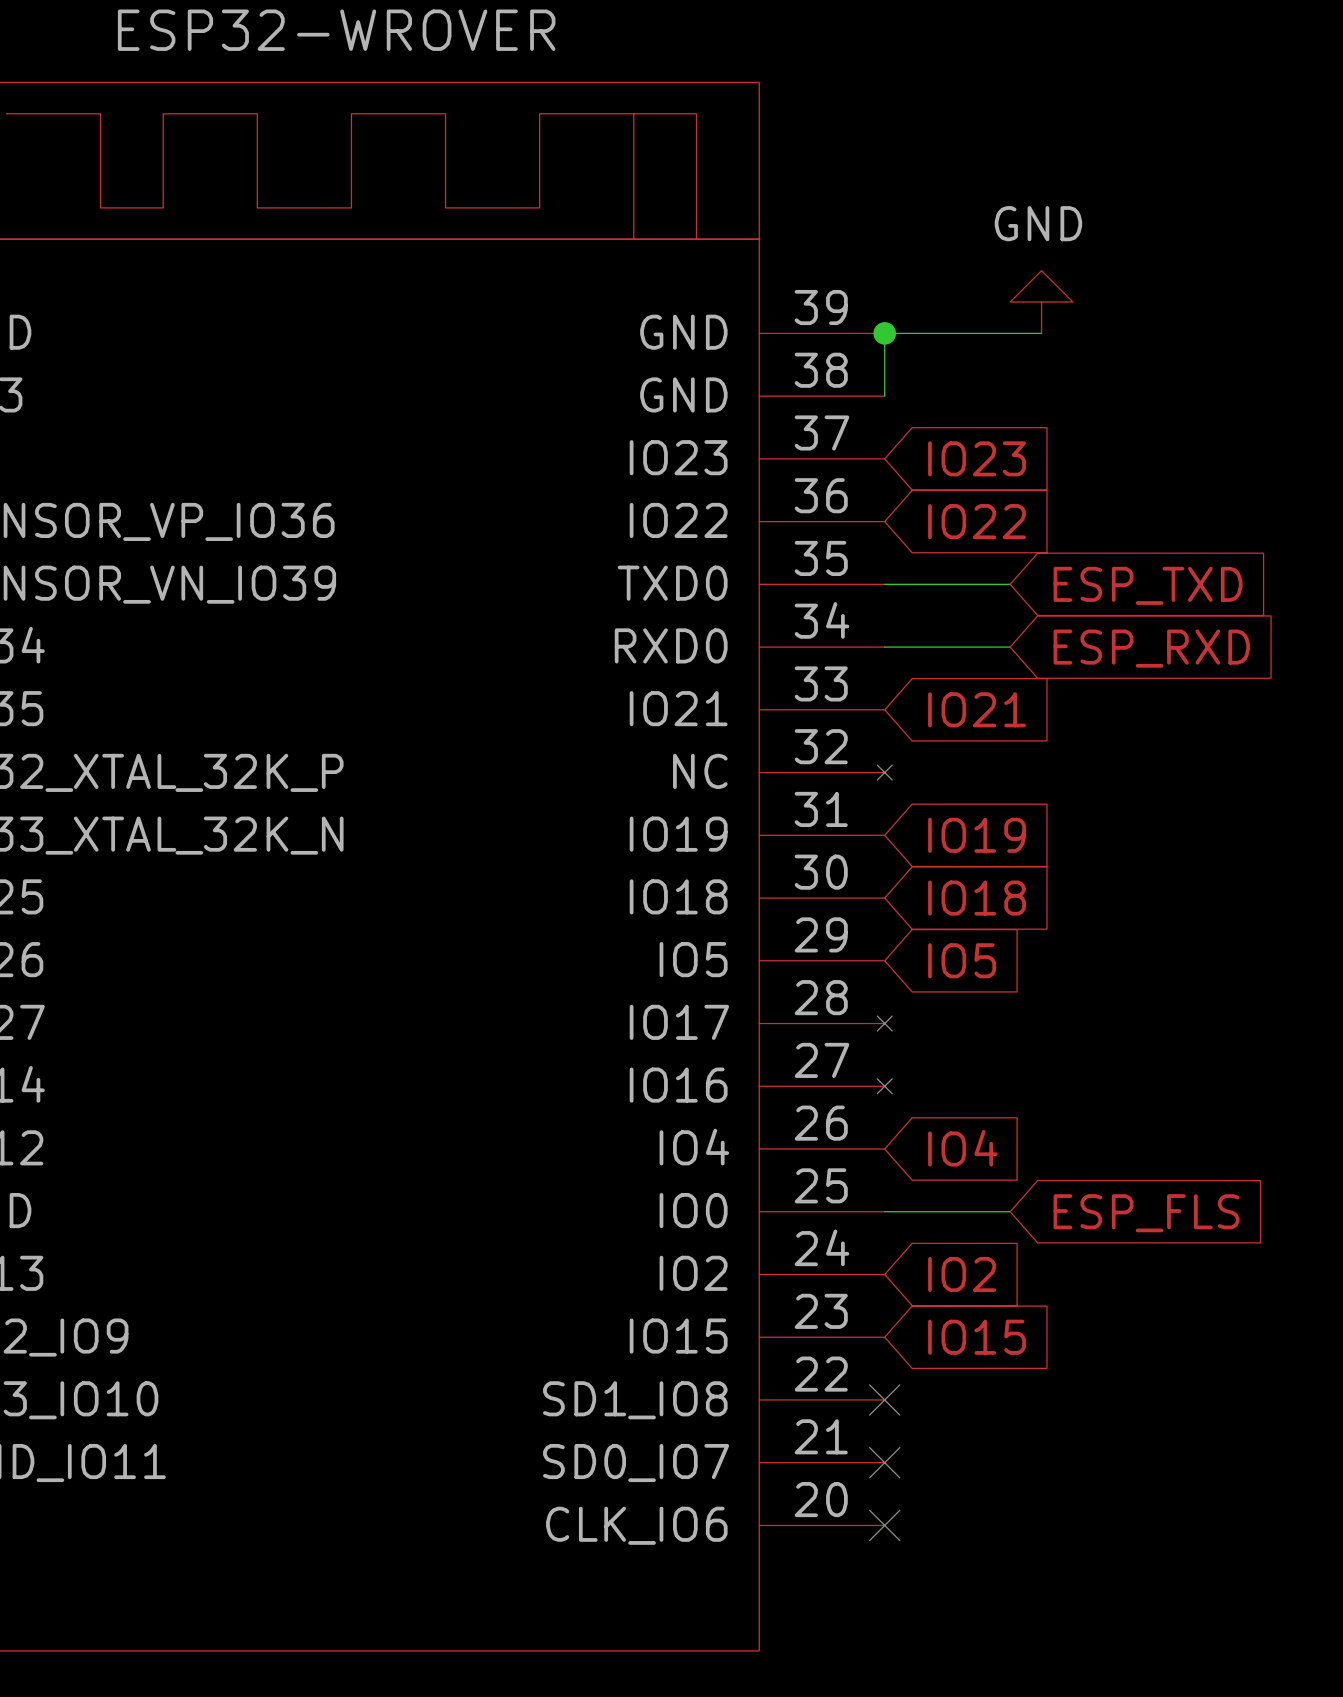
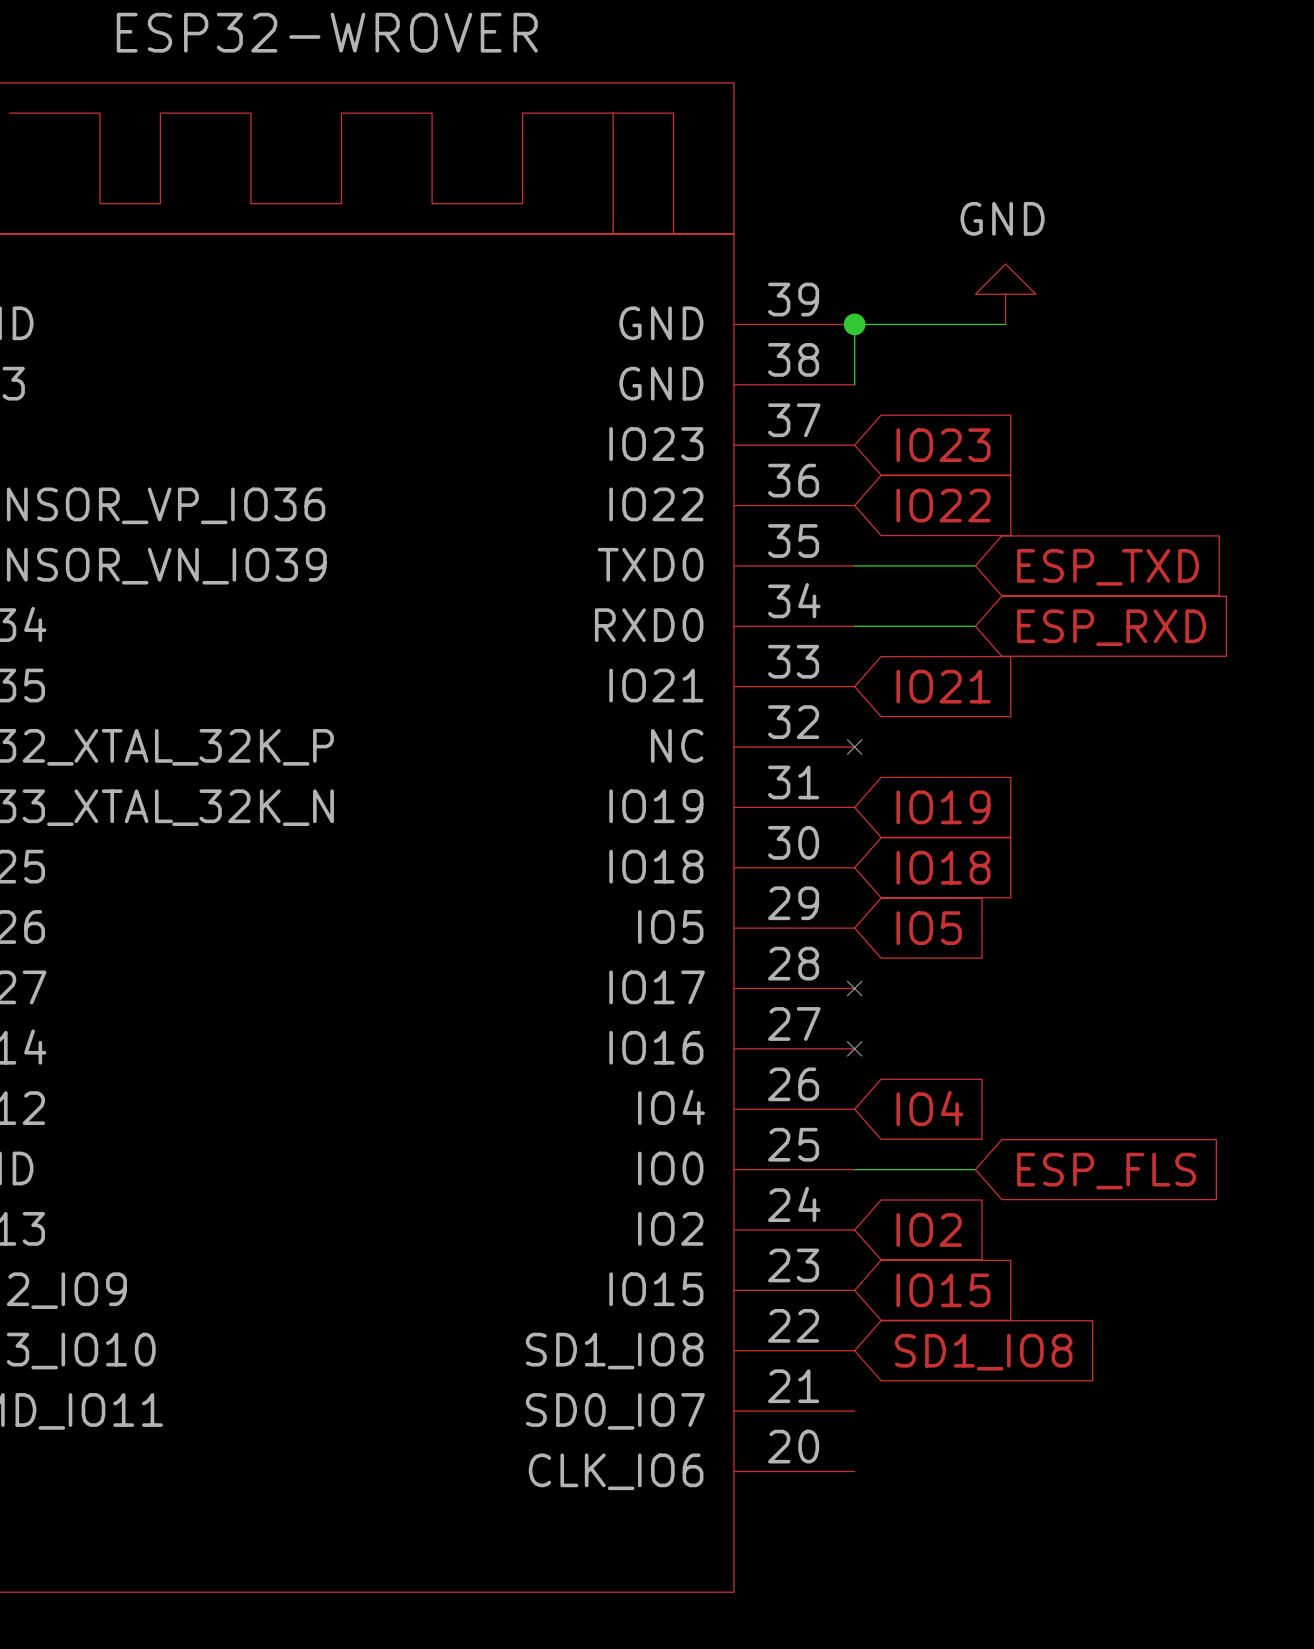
no-connect mark: (884, 1399) -> none
global label: none -> SD1_IO8 (983, 1352)
no-connect mark: (884, 1462) -> none
no-connect mark: (884, 1525) -> none

